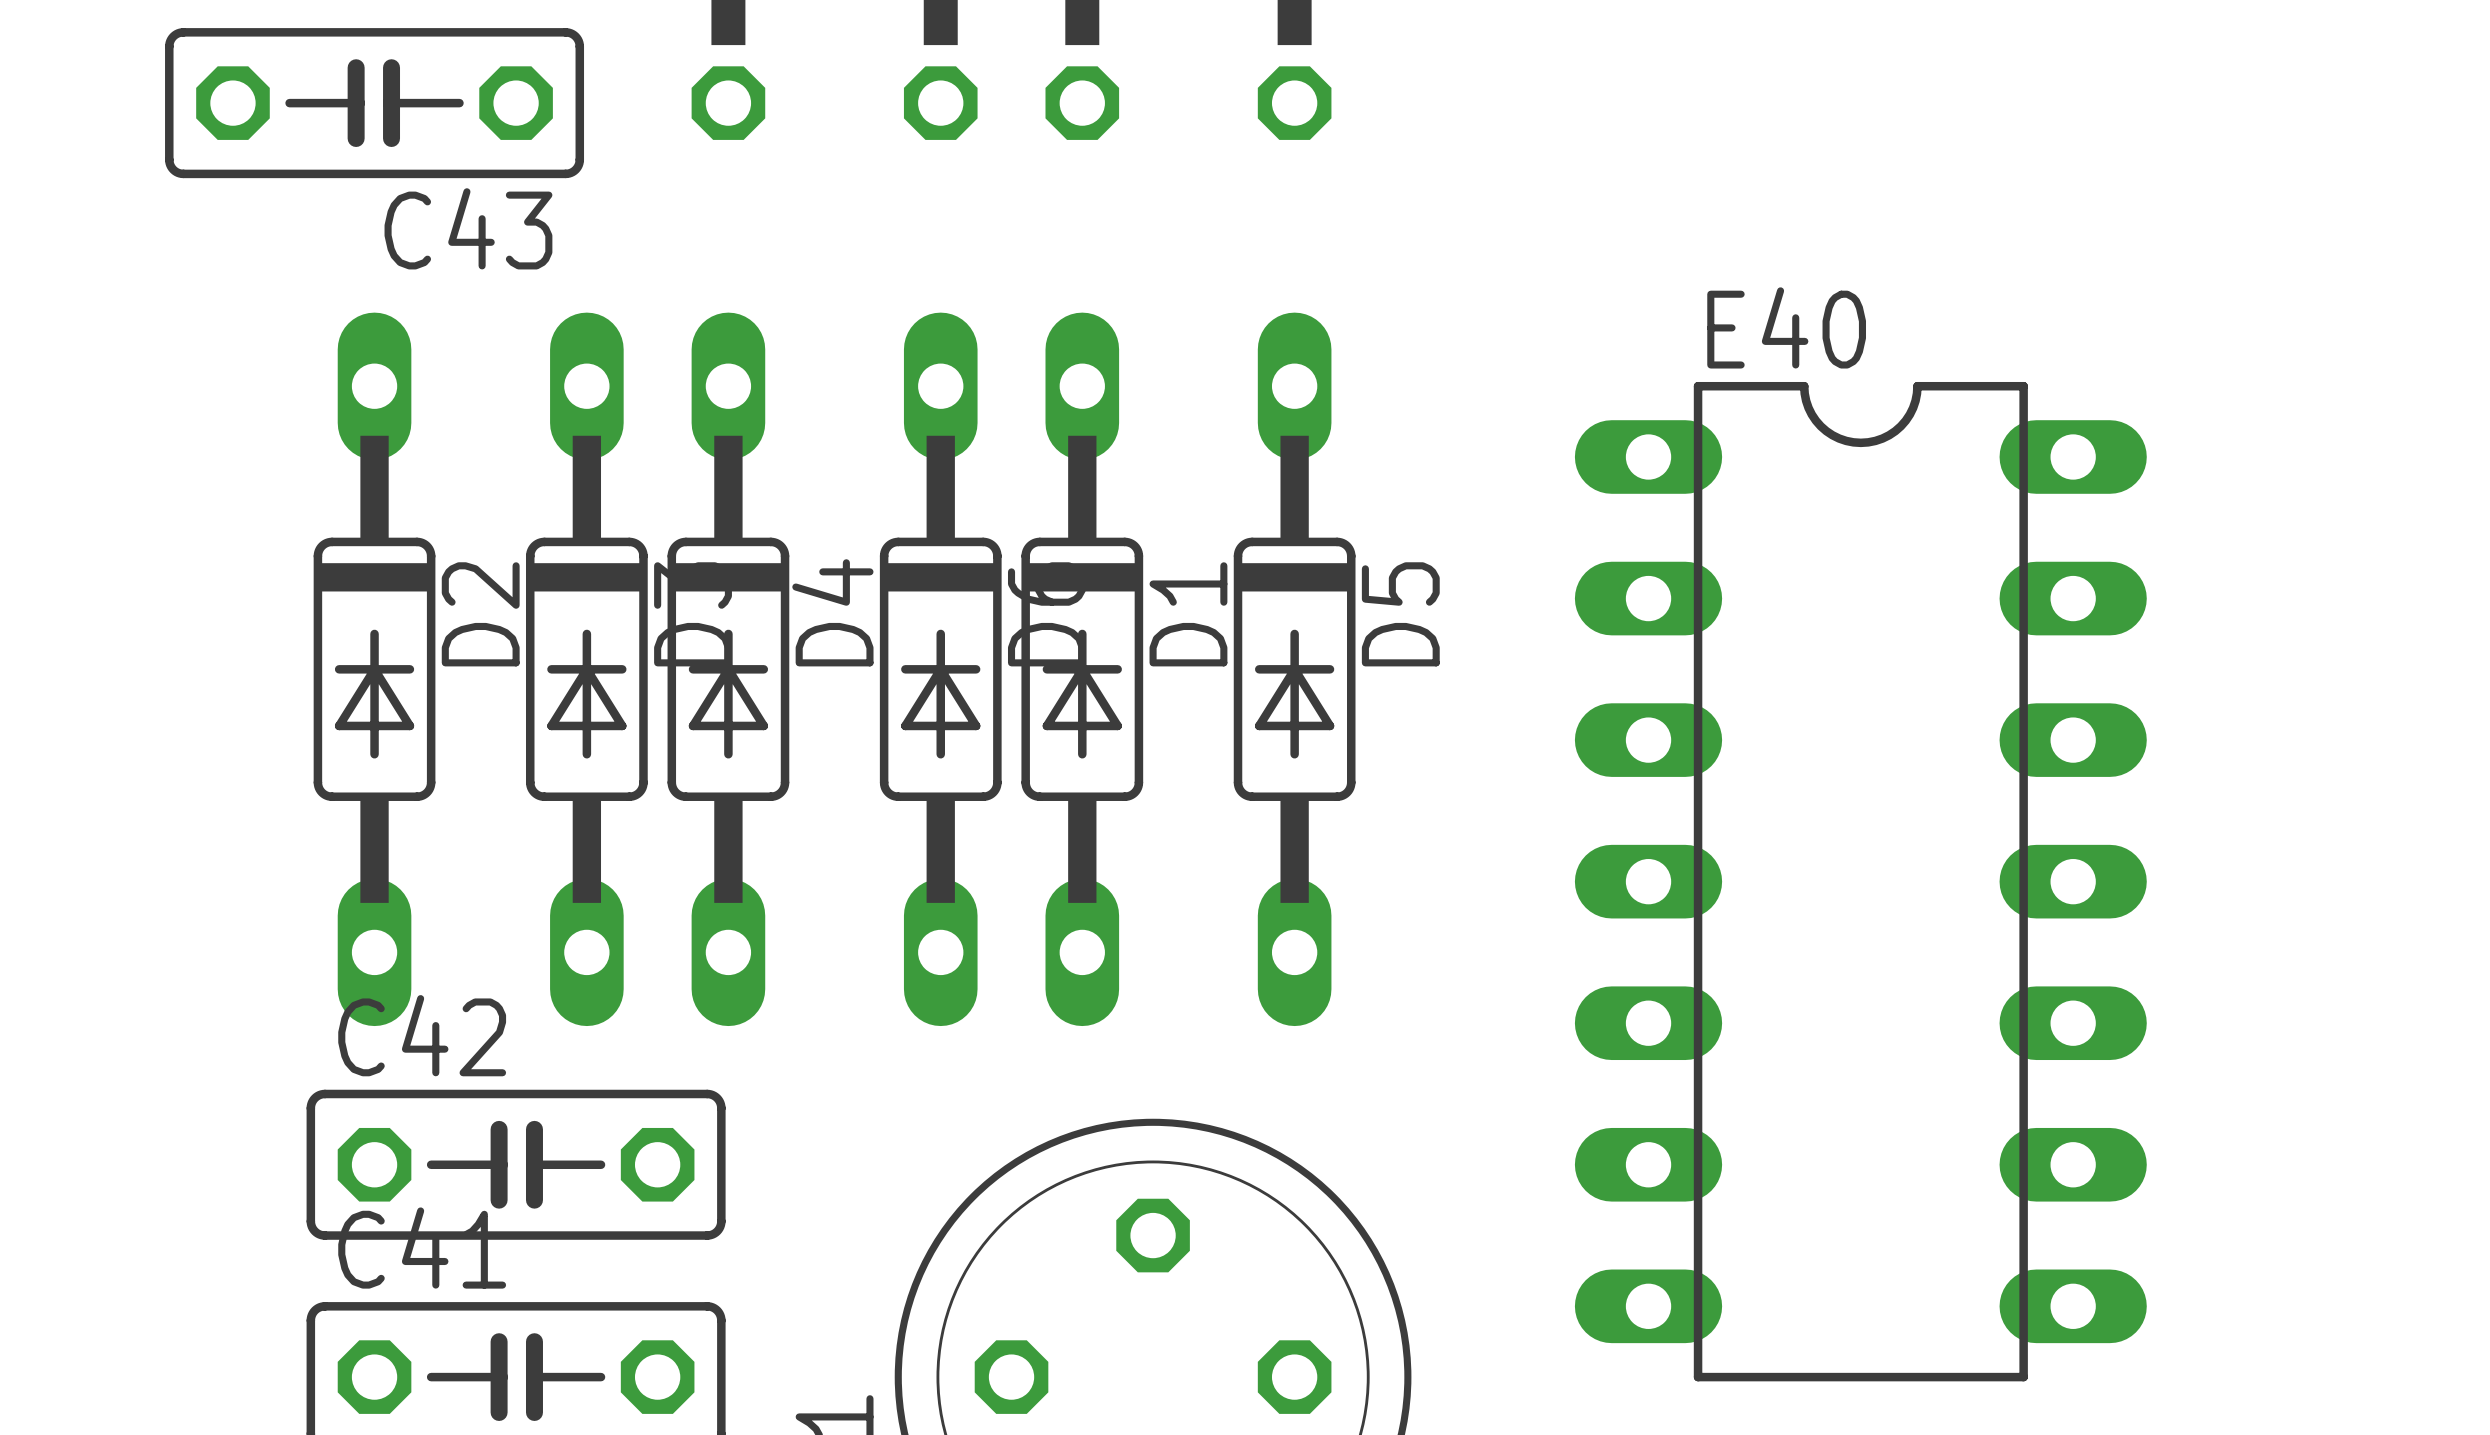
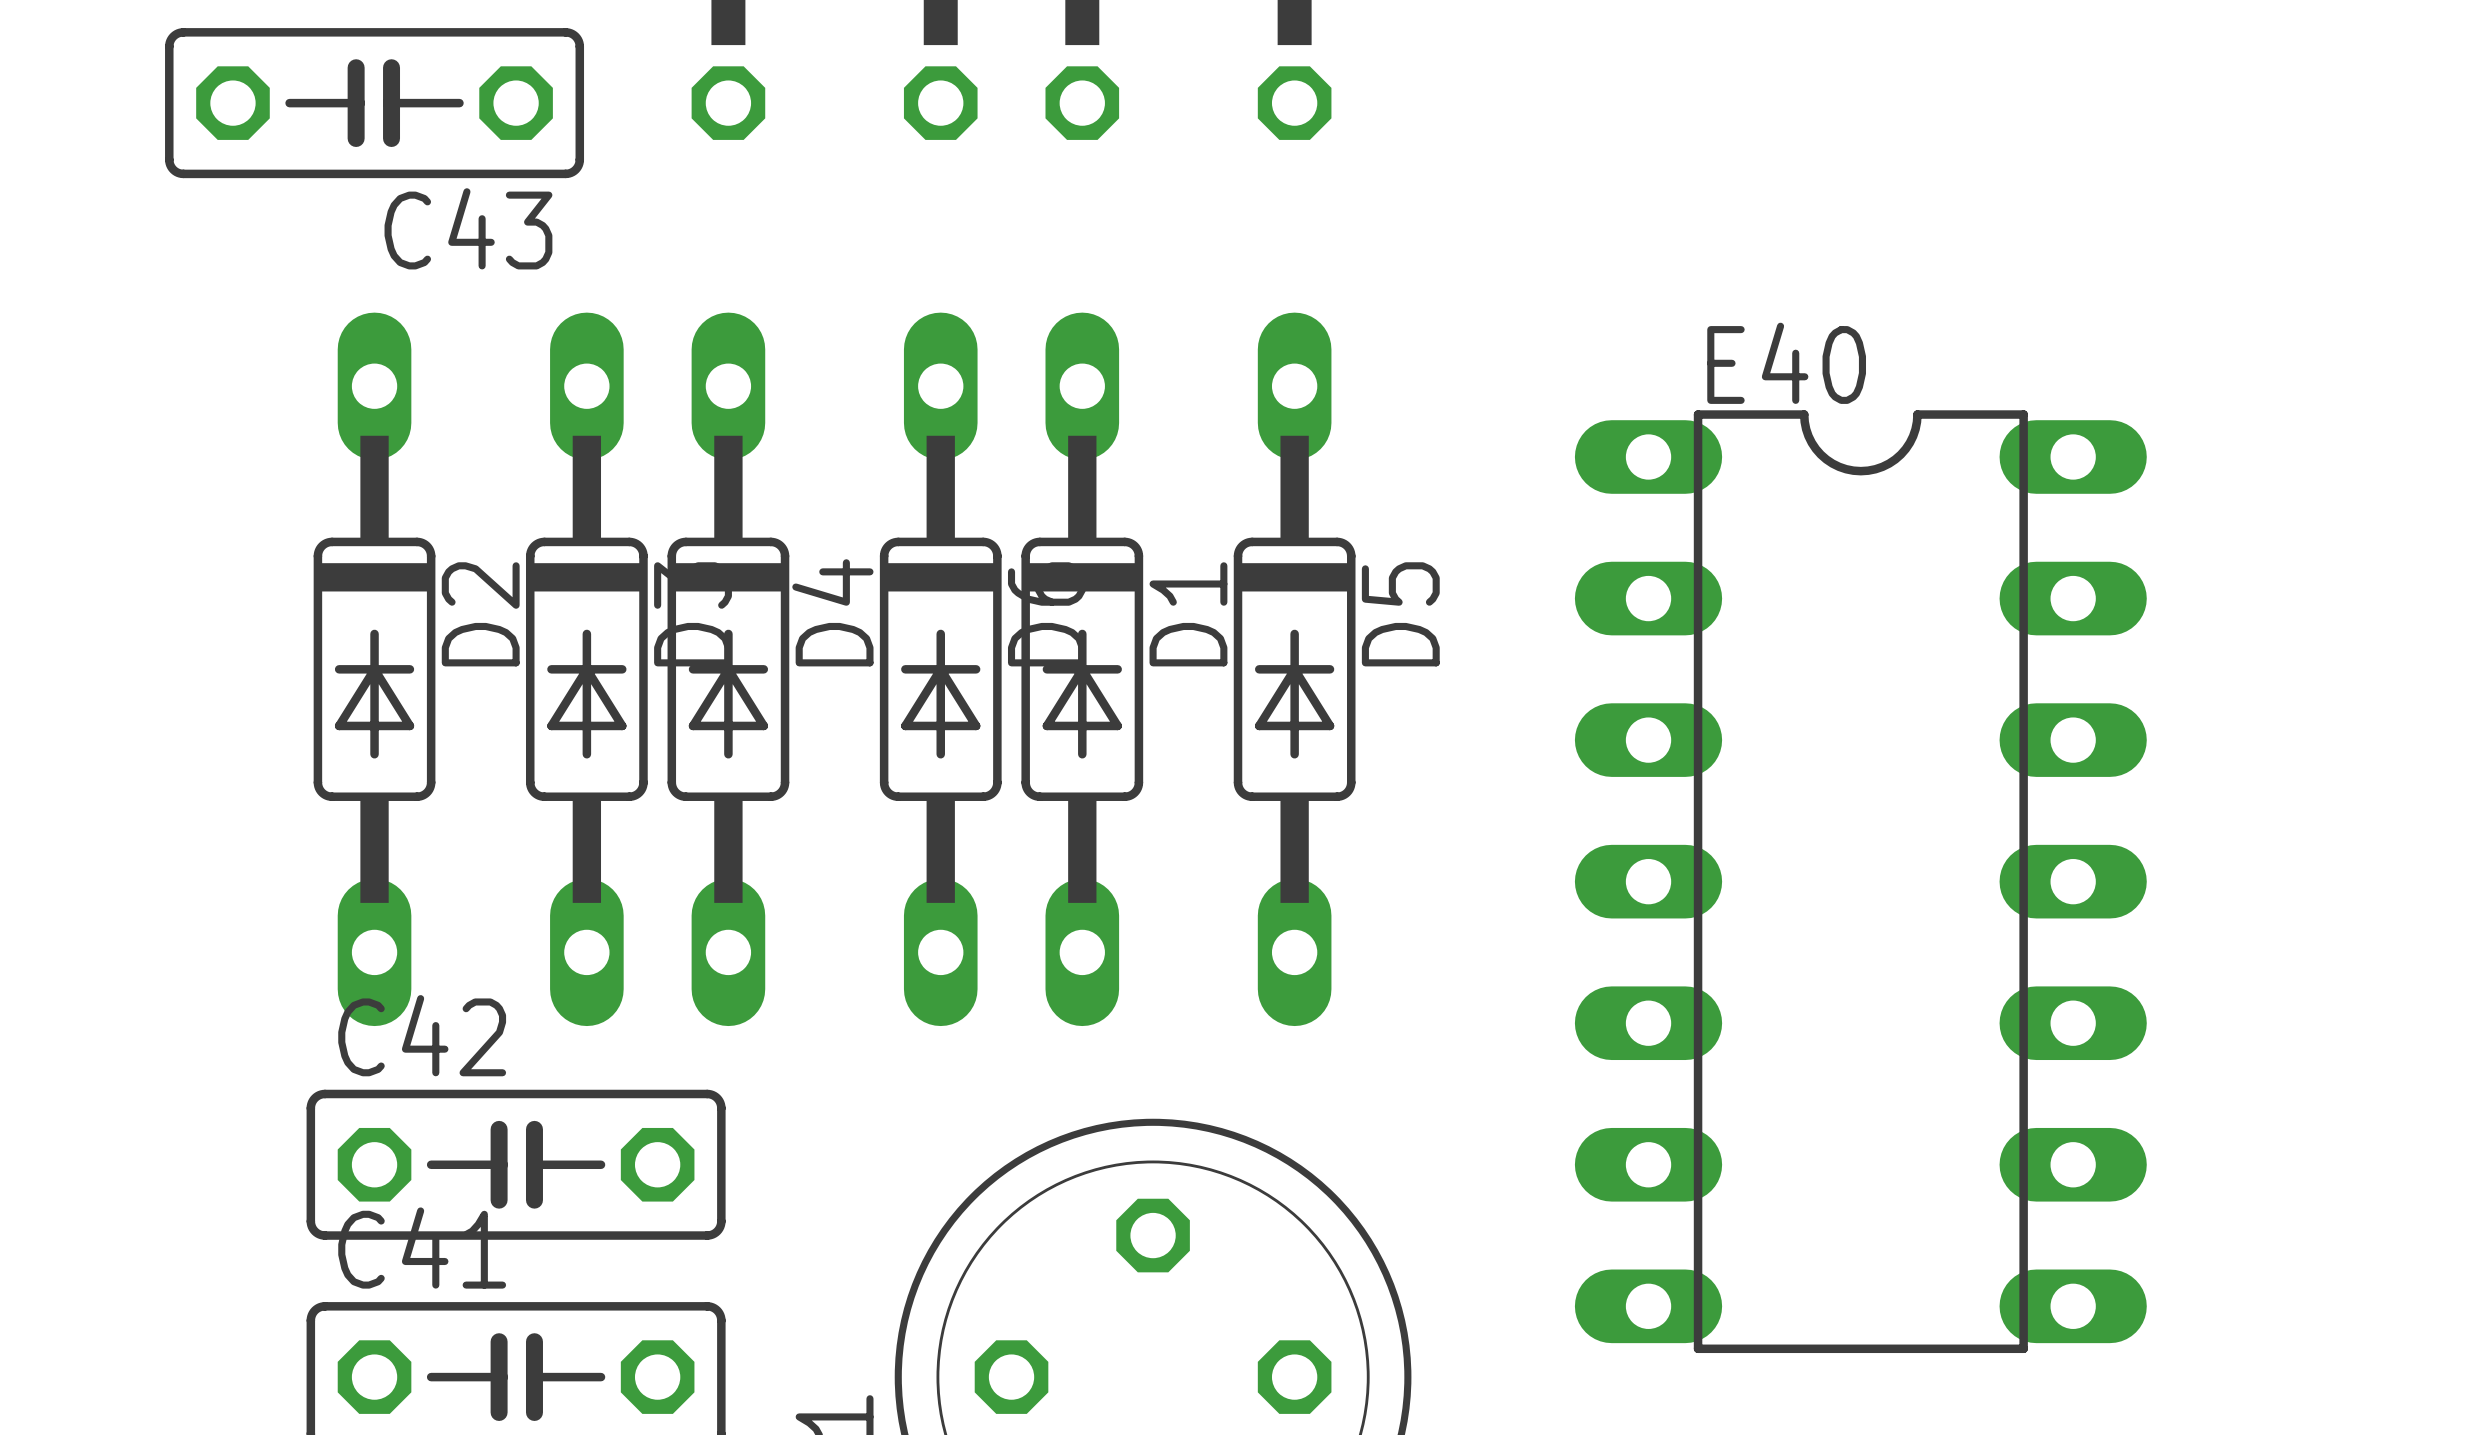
E40 name position: E40 (1786, 327) -> E40 (1786, 363)
E40 footprint: [1574, 381, 2147, 1382] -> [1574, 410, 2147, 1354]

